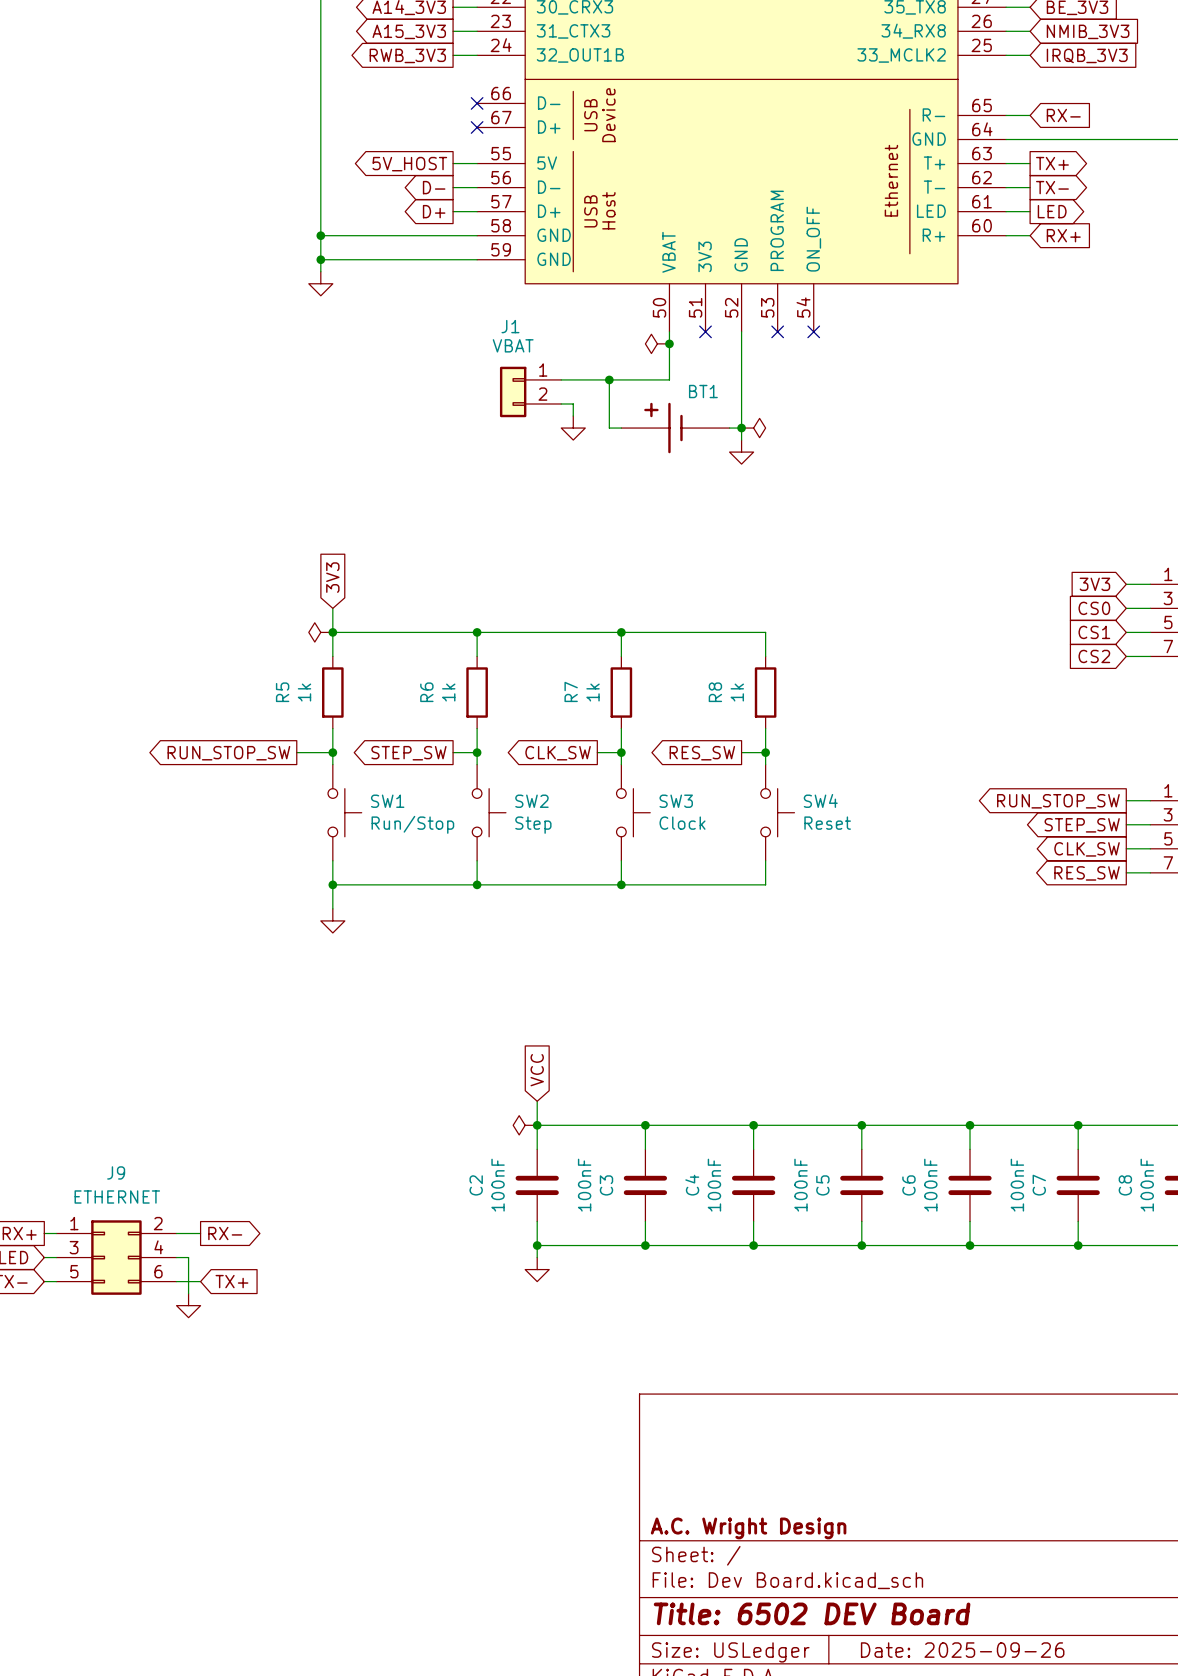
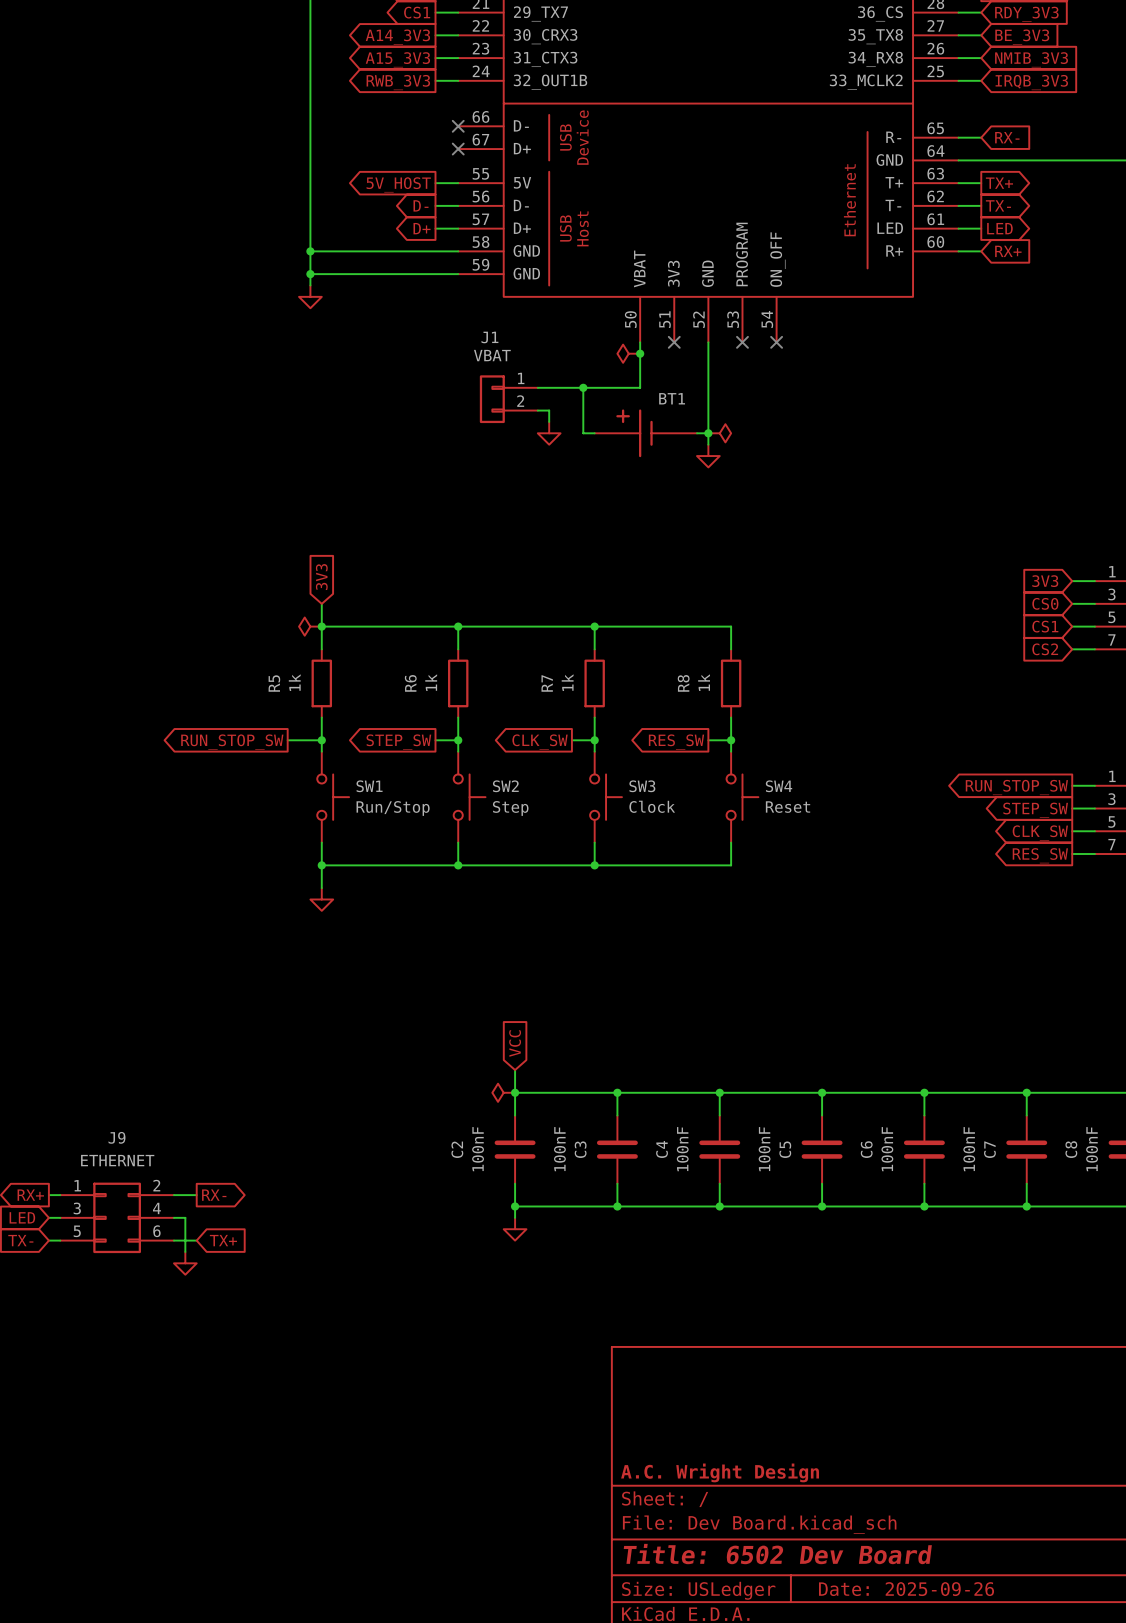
title block: Title: 6502 DEV Board (812, 1613) -> Title: 6502 Dev Board (777, 1554)

